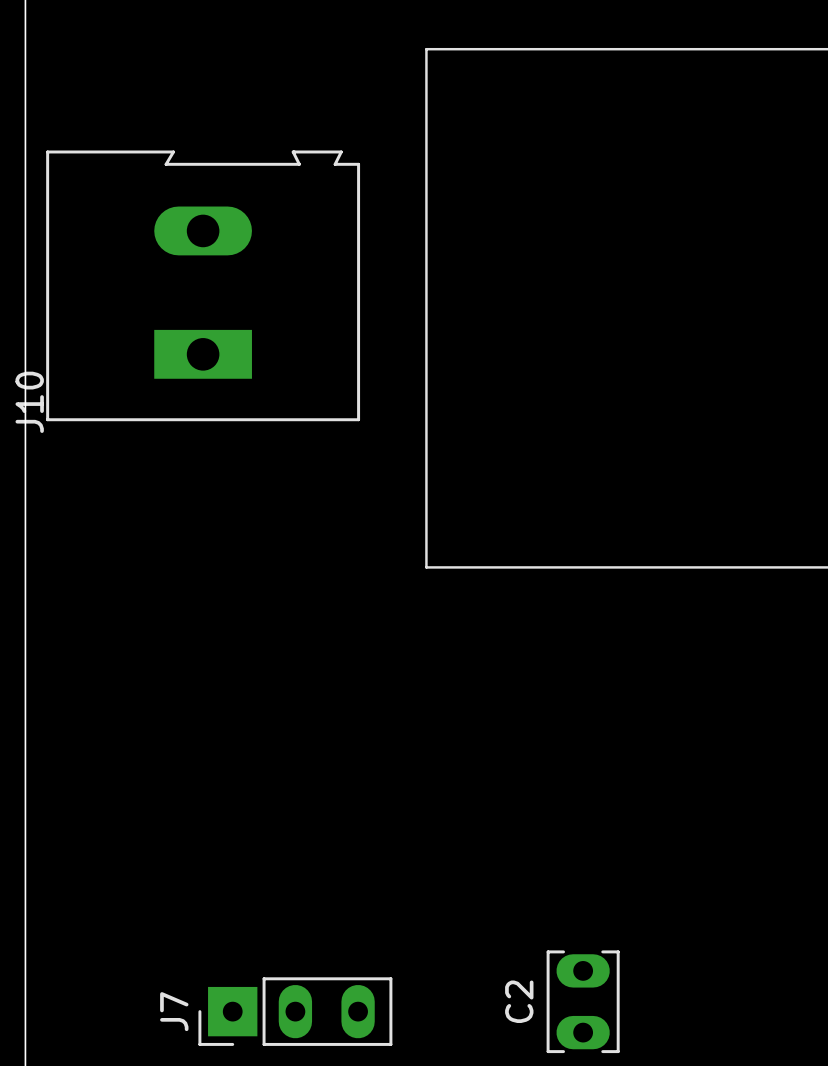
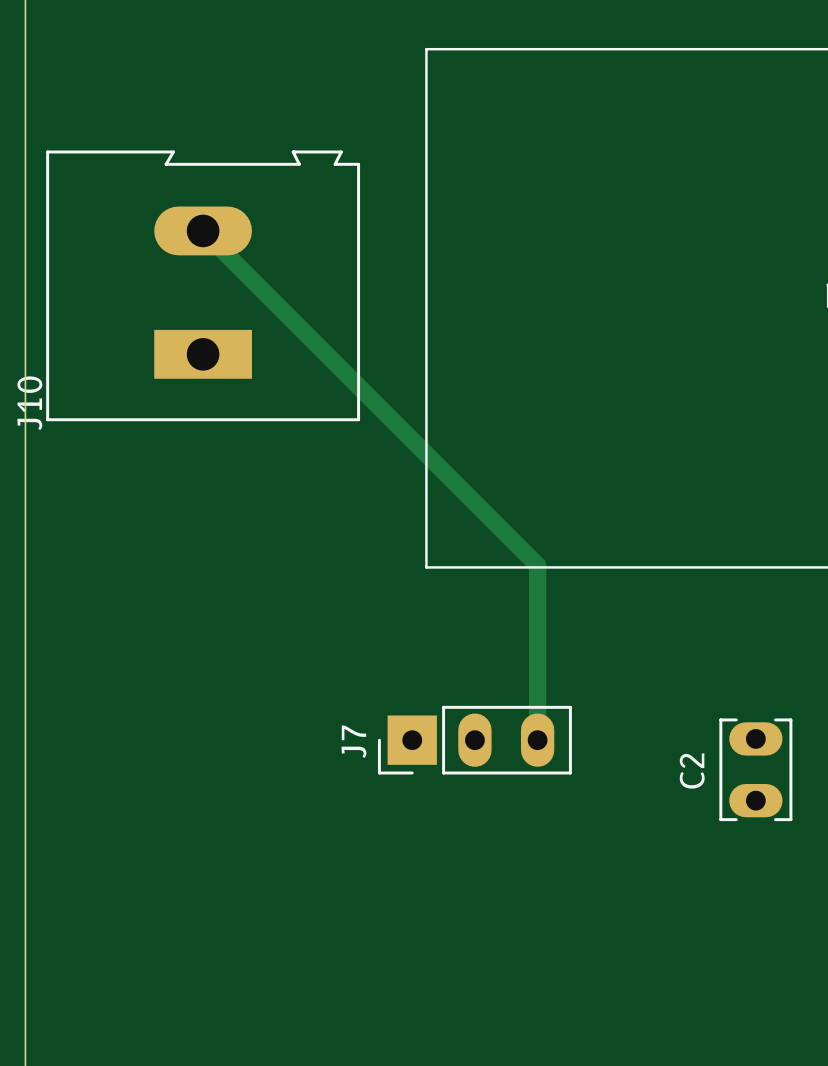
track: none -> (203, 230) (537, 565) (537, 740)
C2 position: (583, 1001) -> (755, 769)
J7 position: (295, 1011) -> (474, 740)

